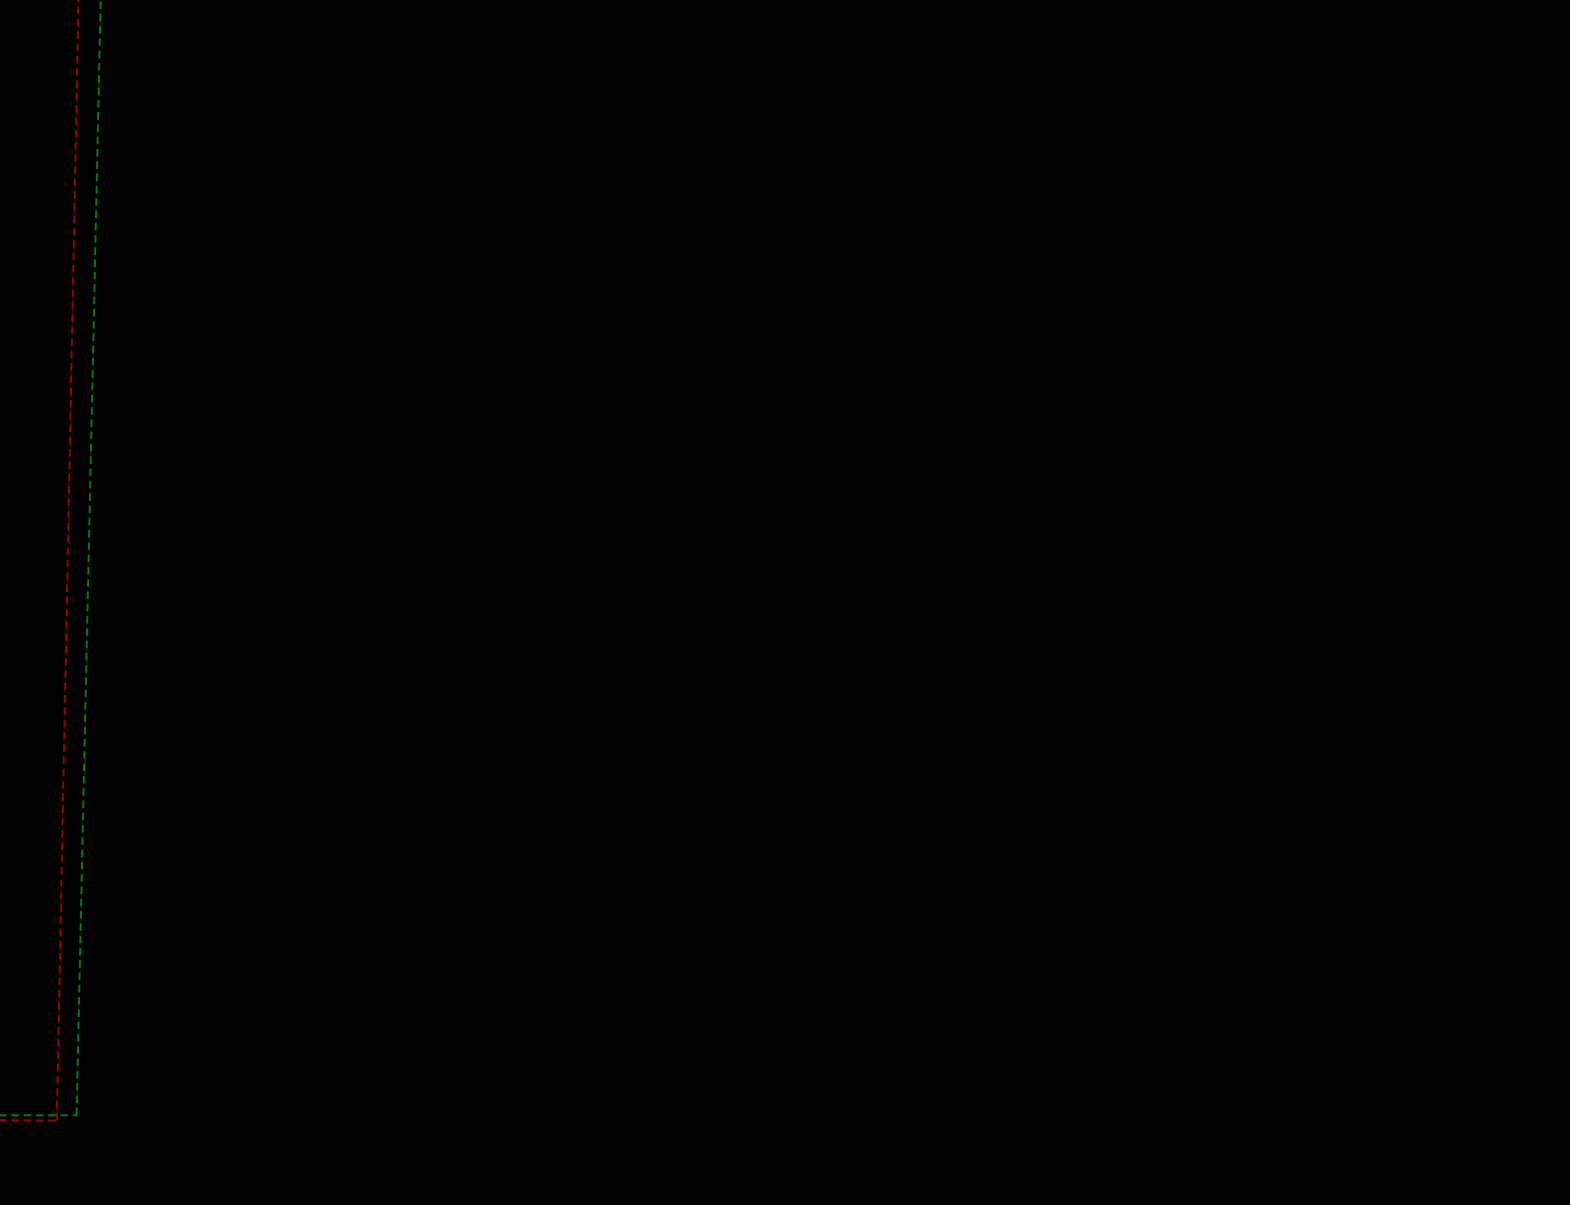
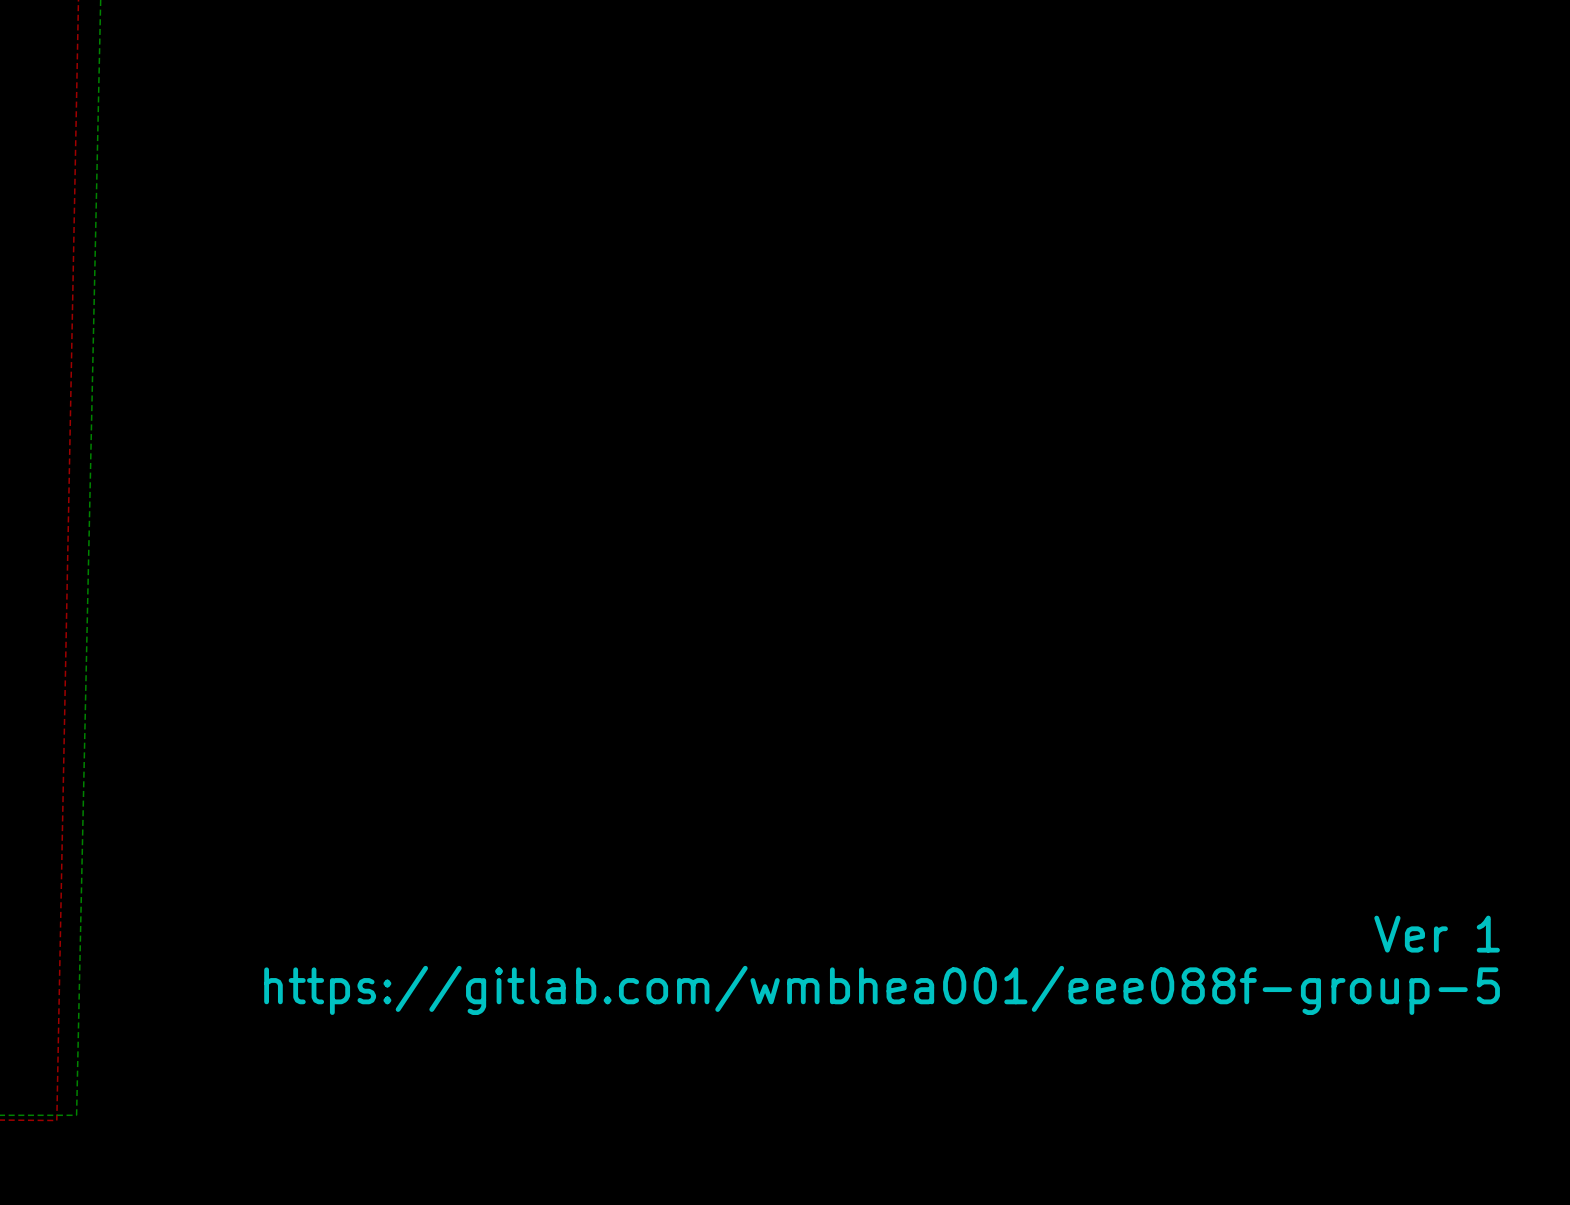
text: none -> Ver 1 (1437, 934)
text: none -> https://gitlab.com/wmbhea001/eee088f-group-5 (882, 990)

